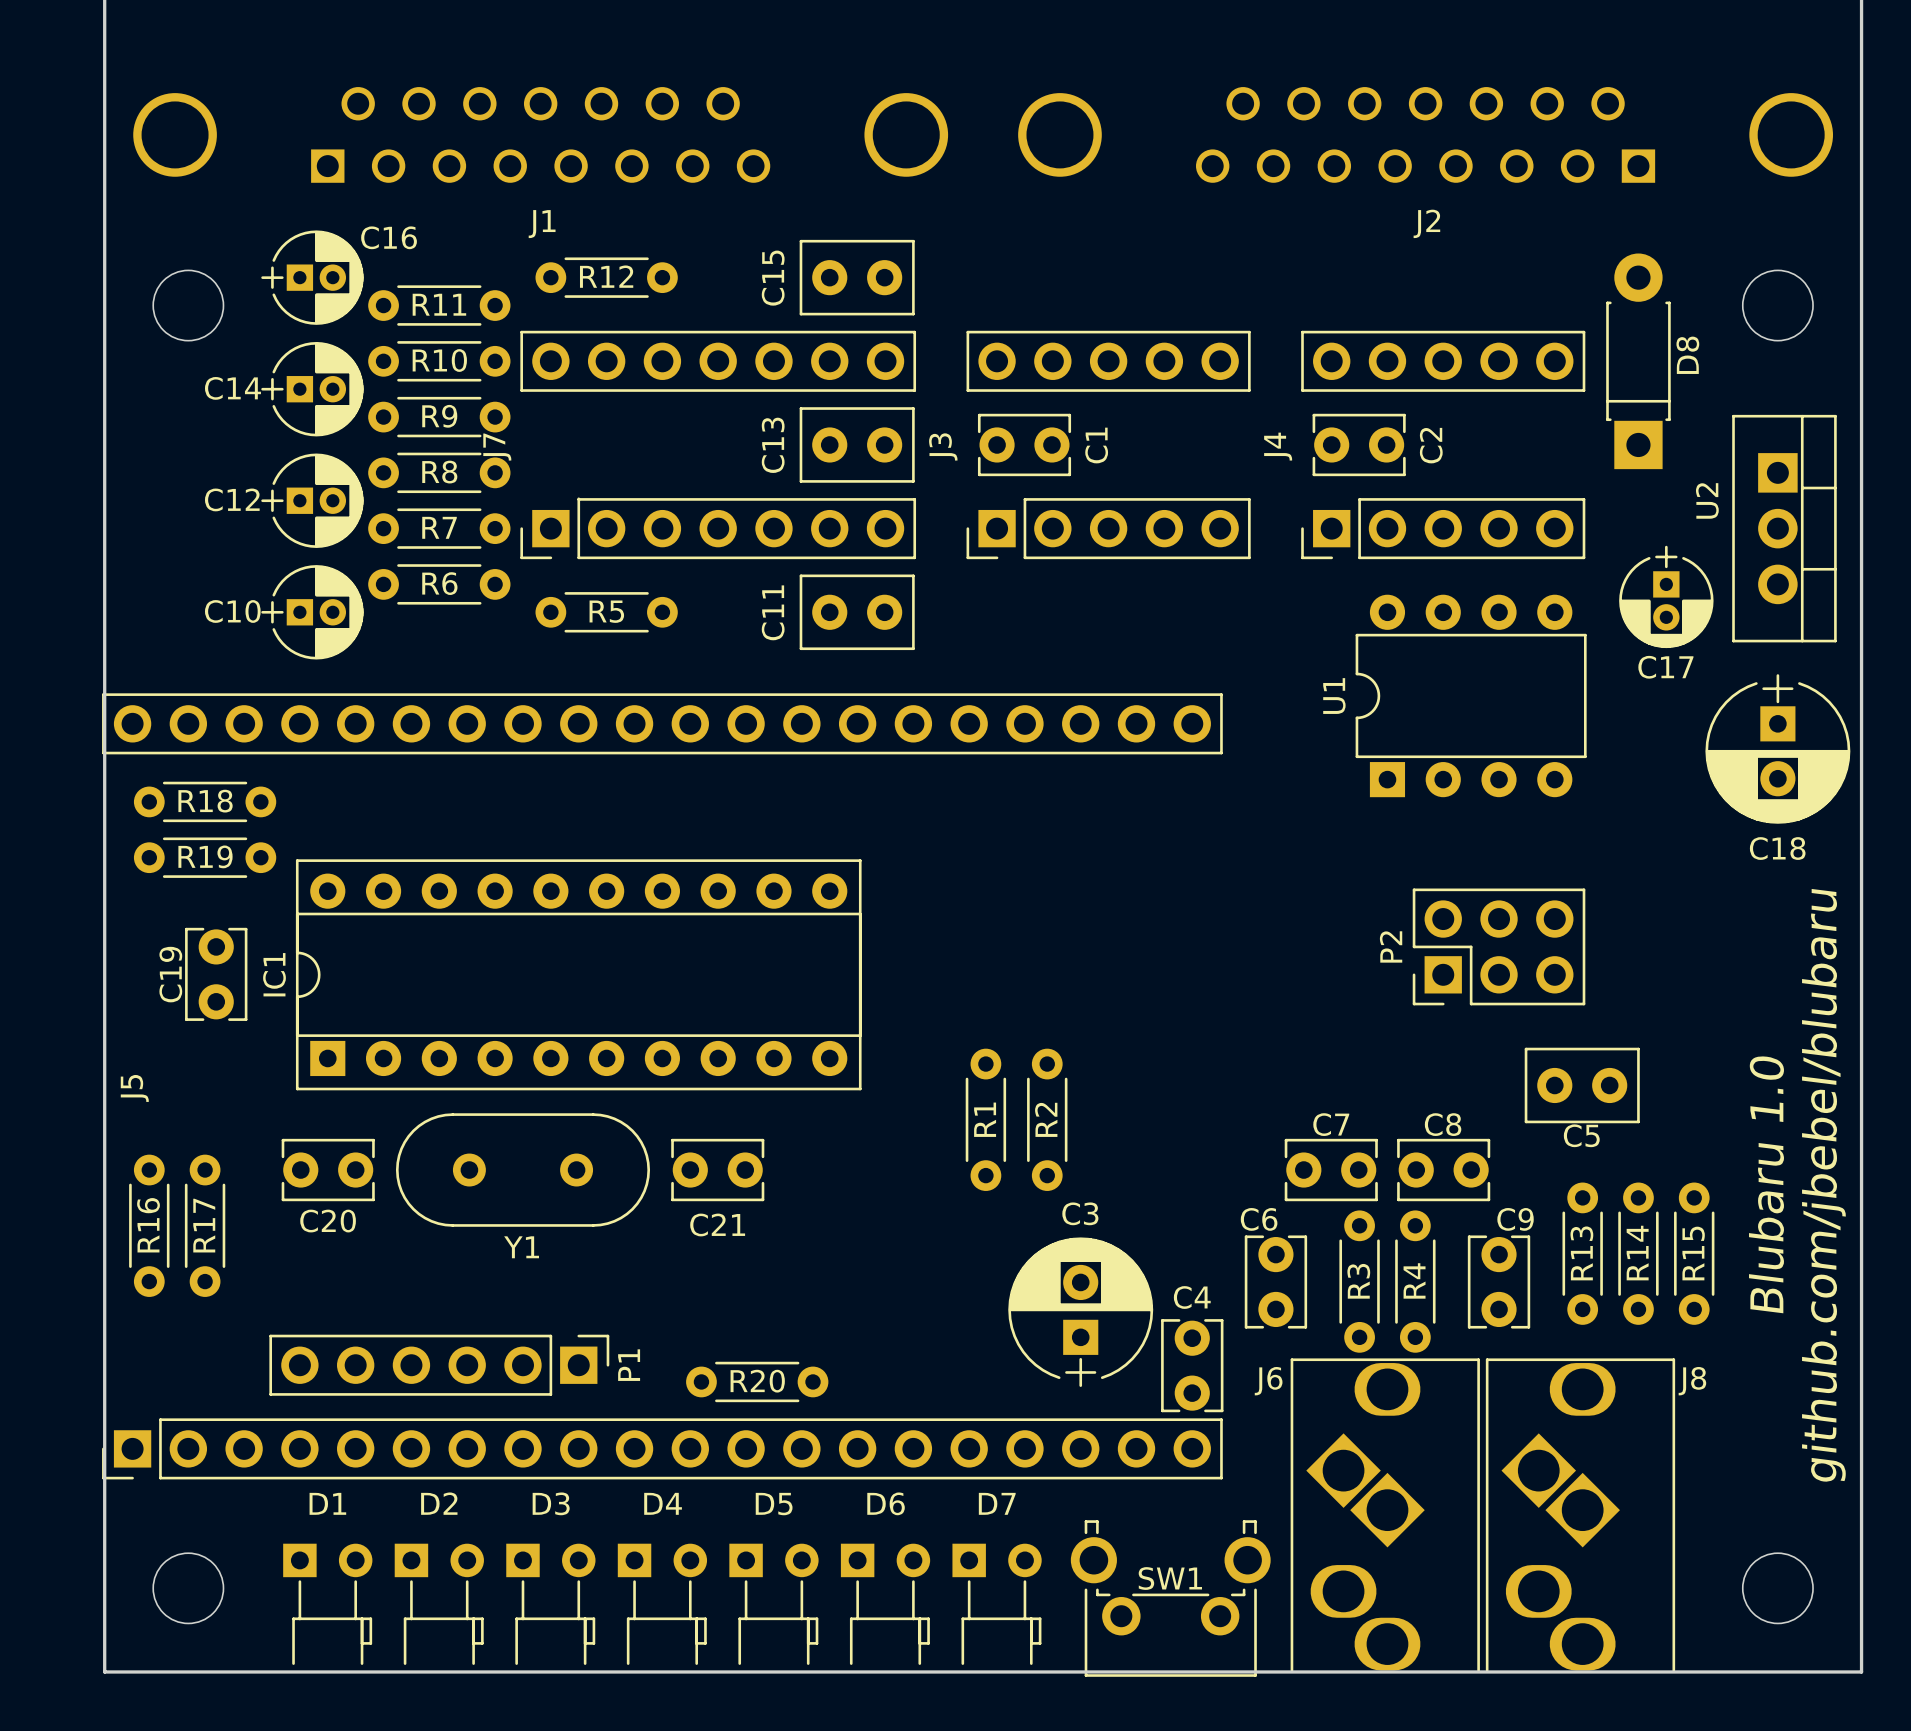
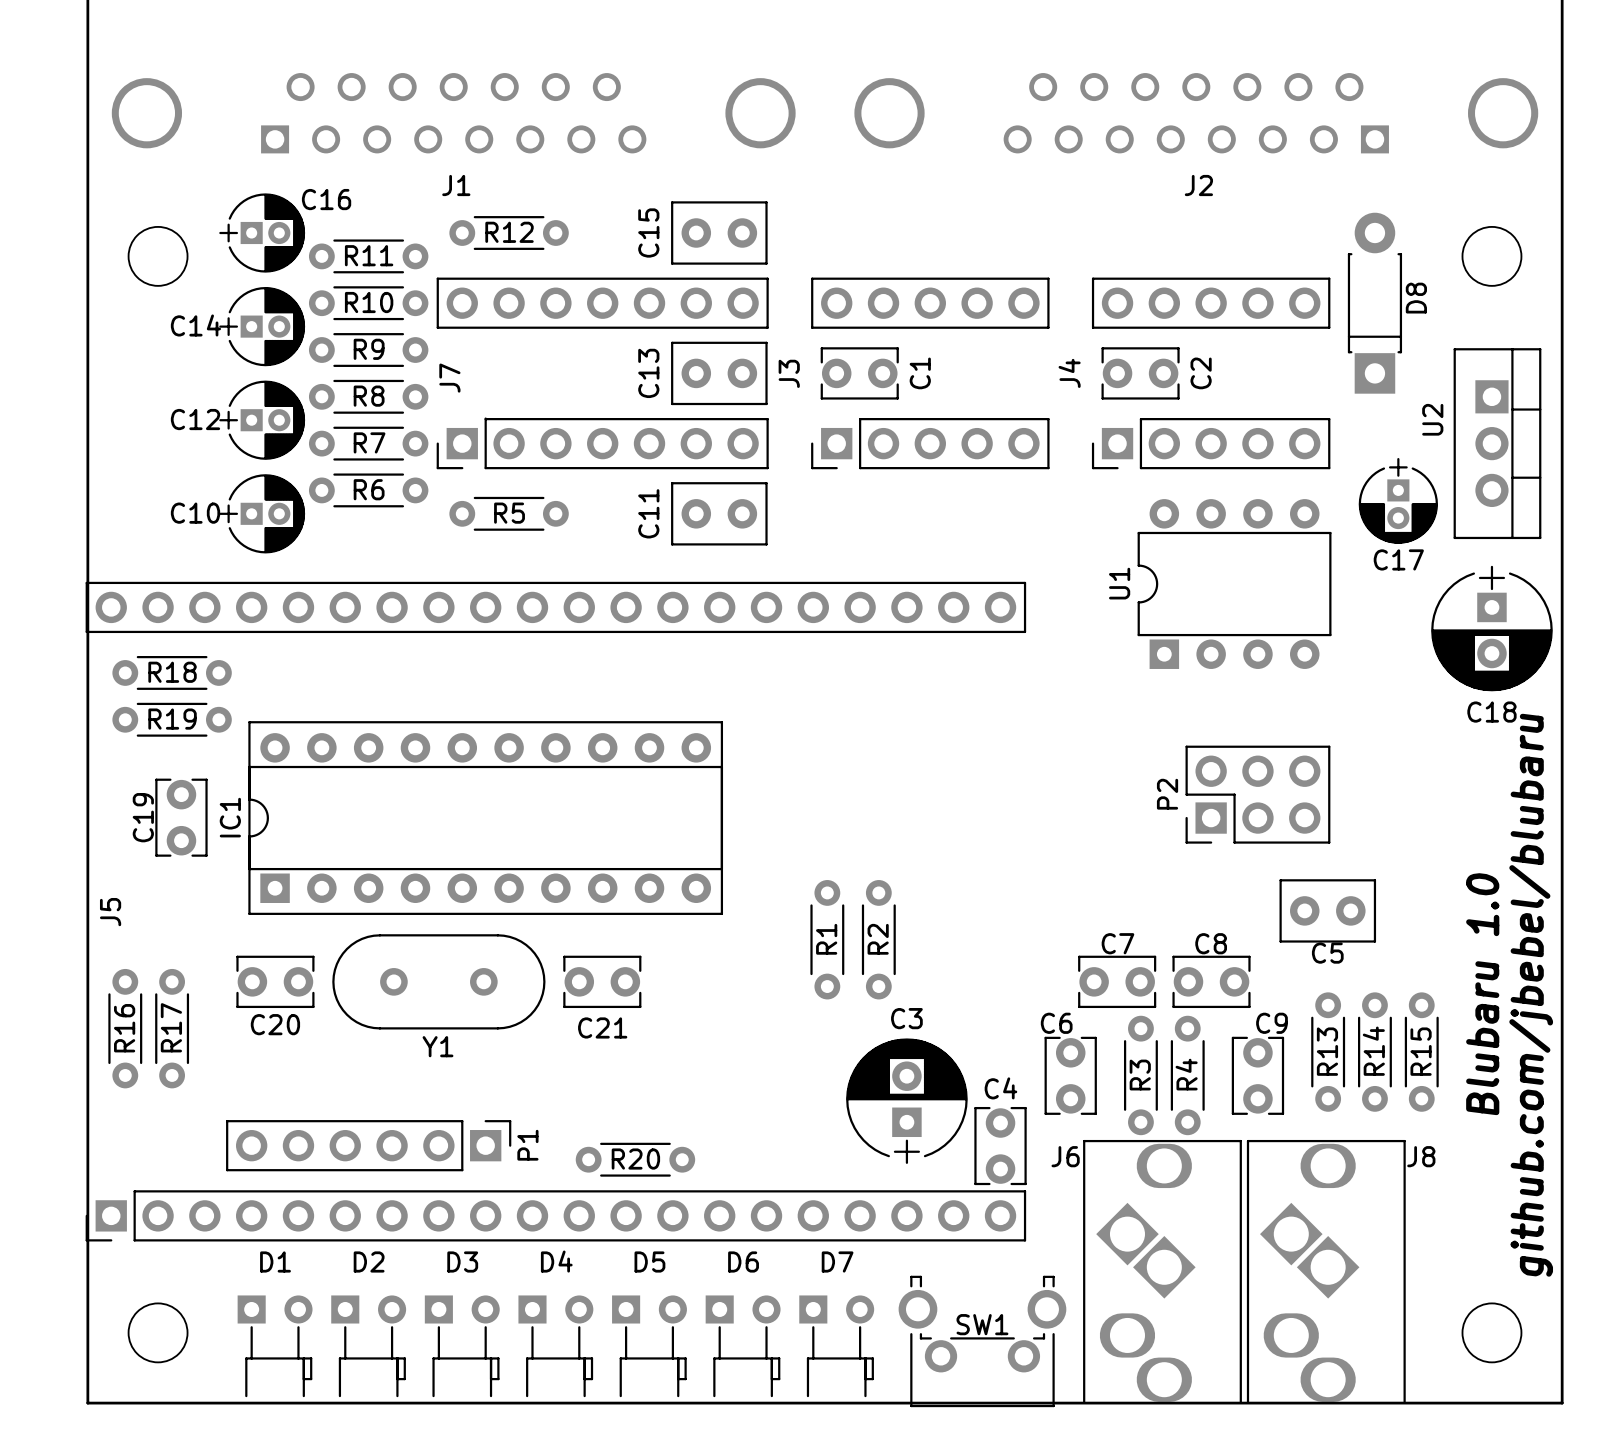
J7 name position: J7 (497, 447) -> J7 (449, 378)

